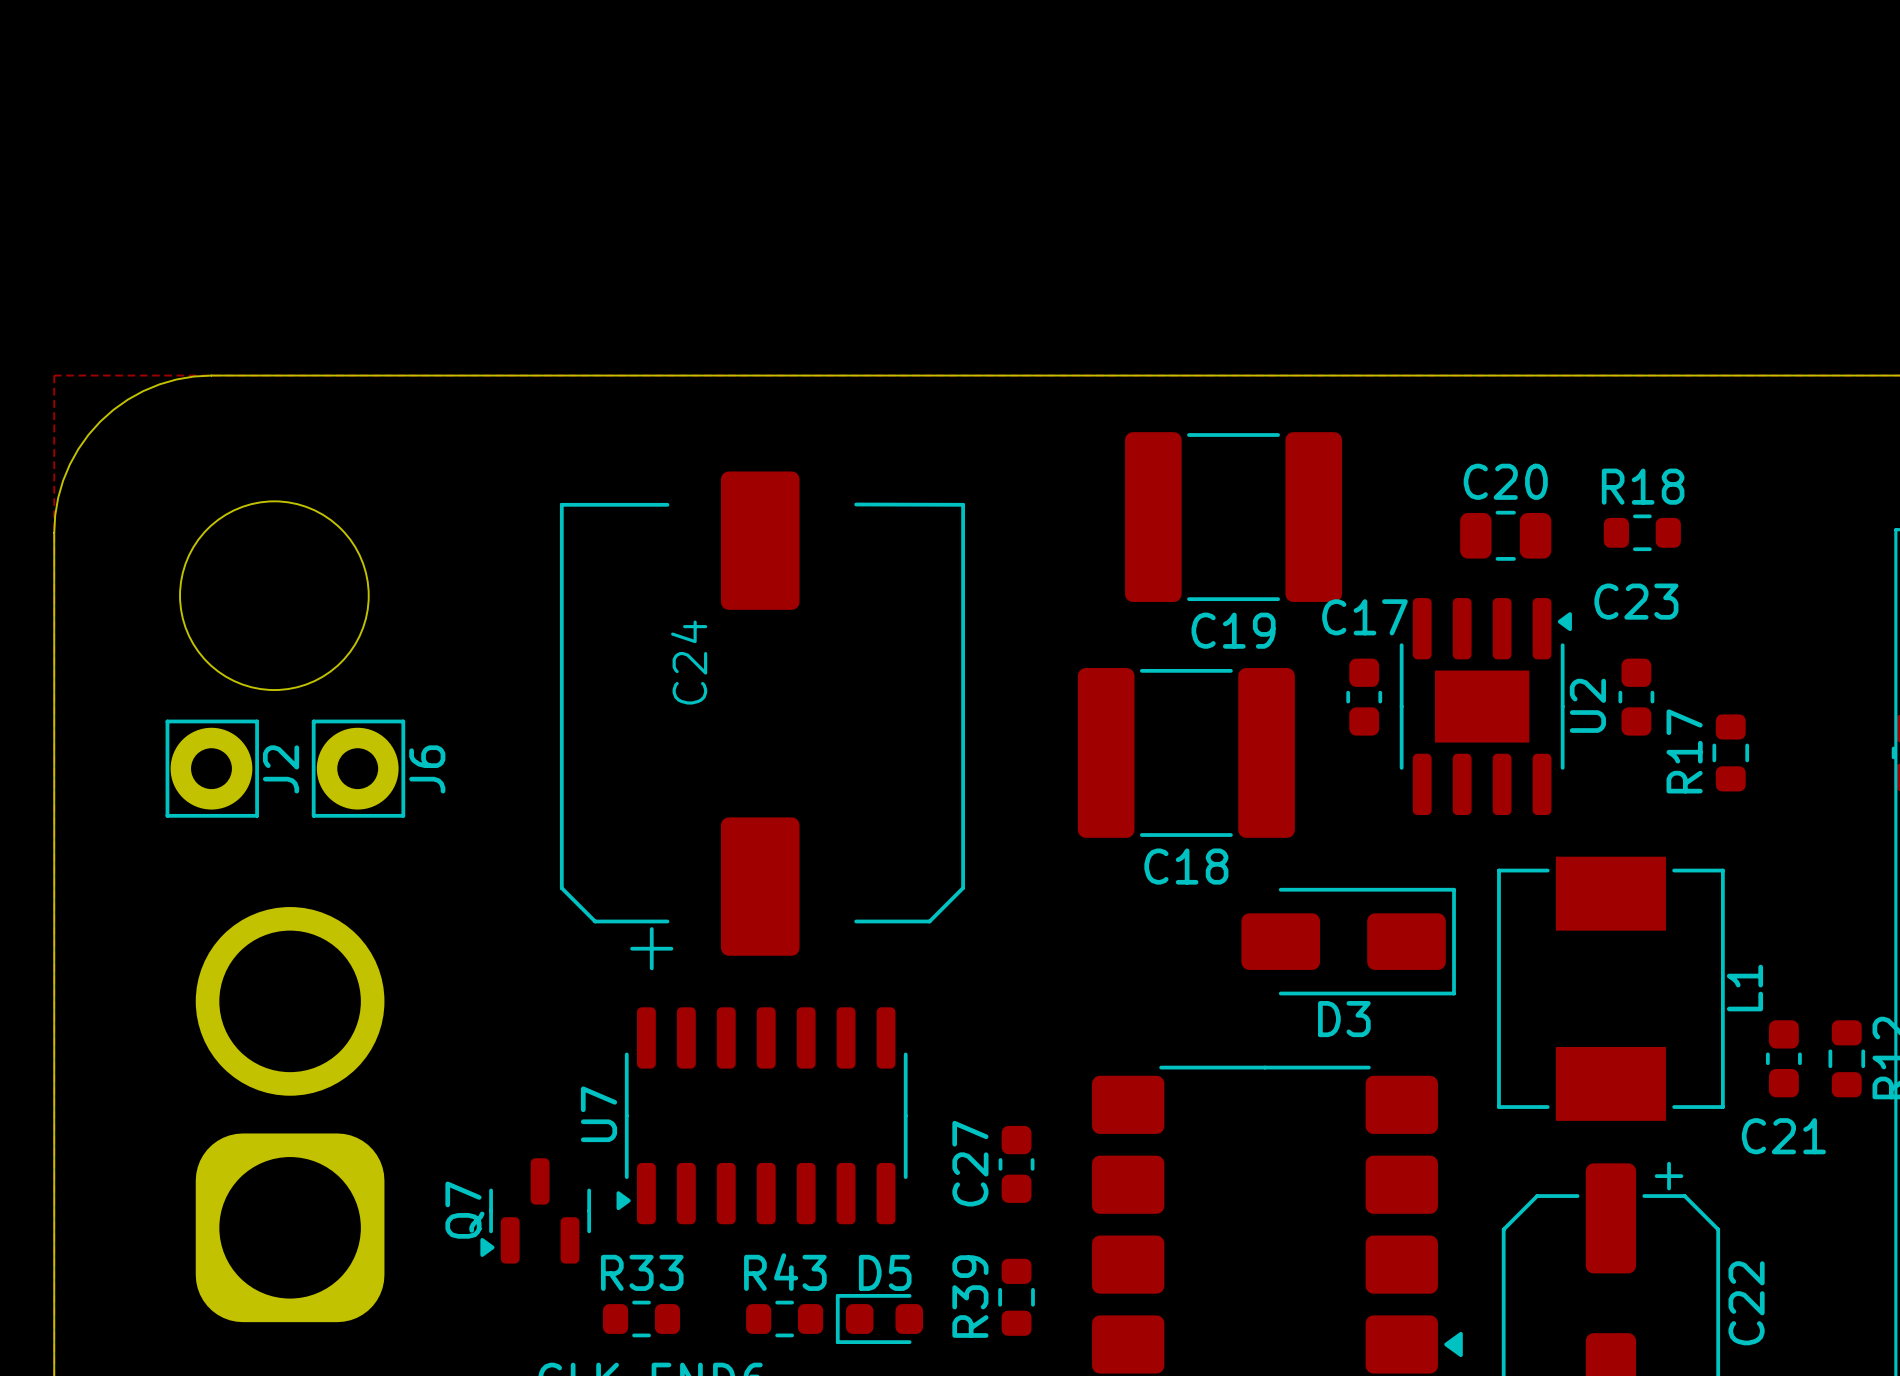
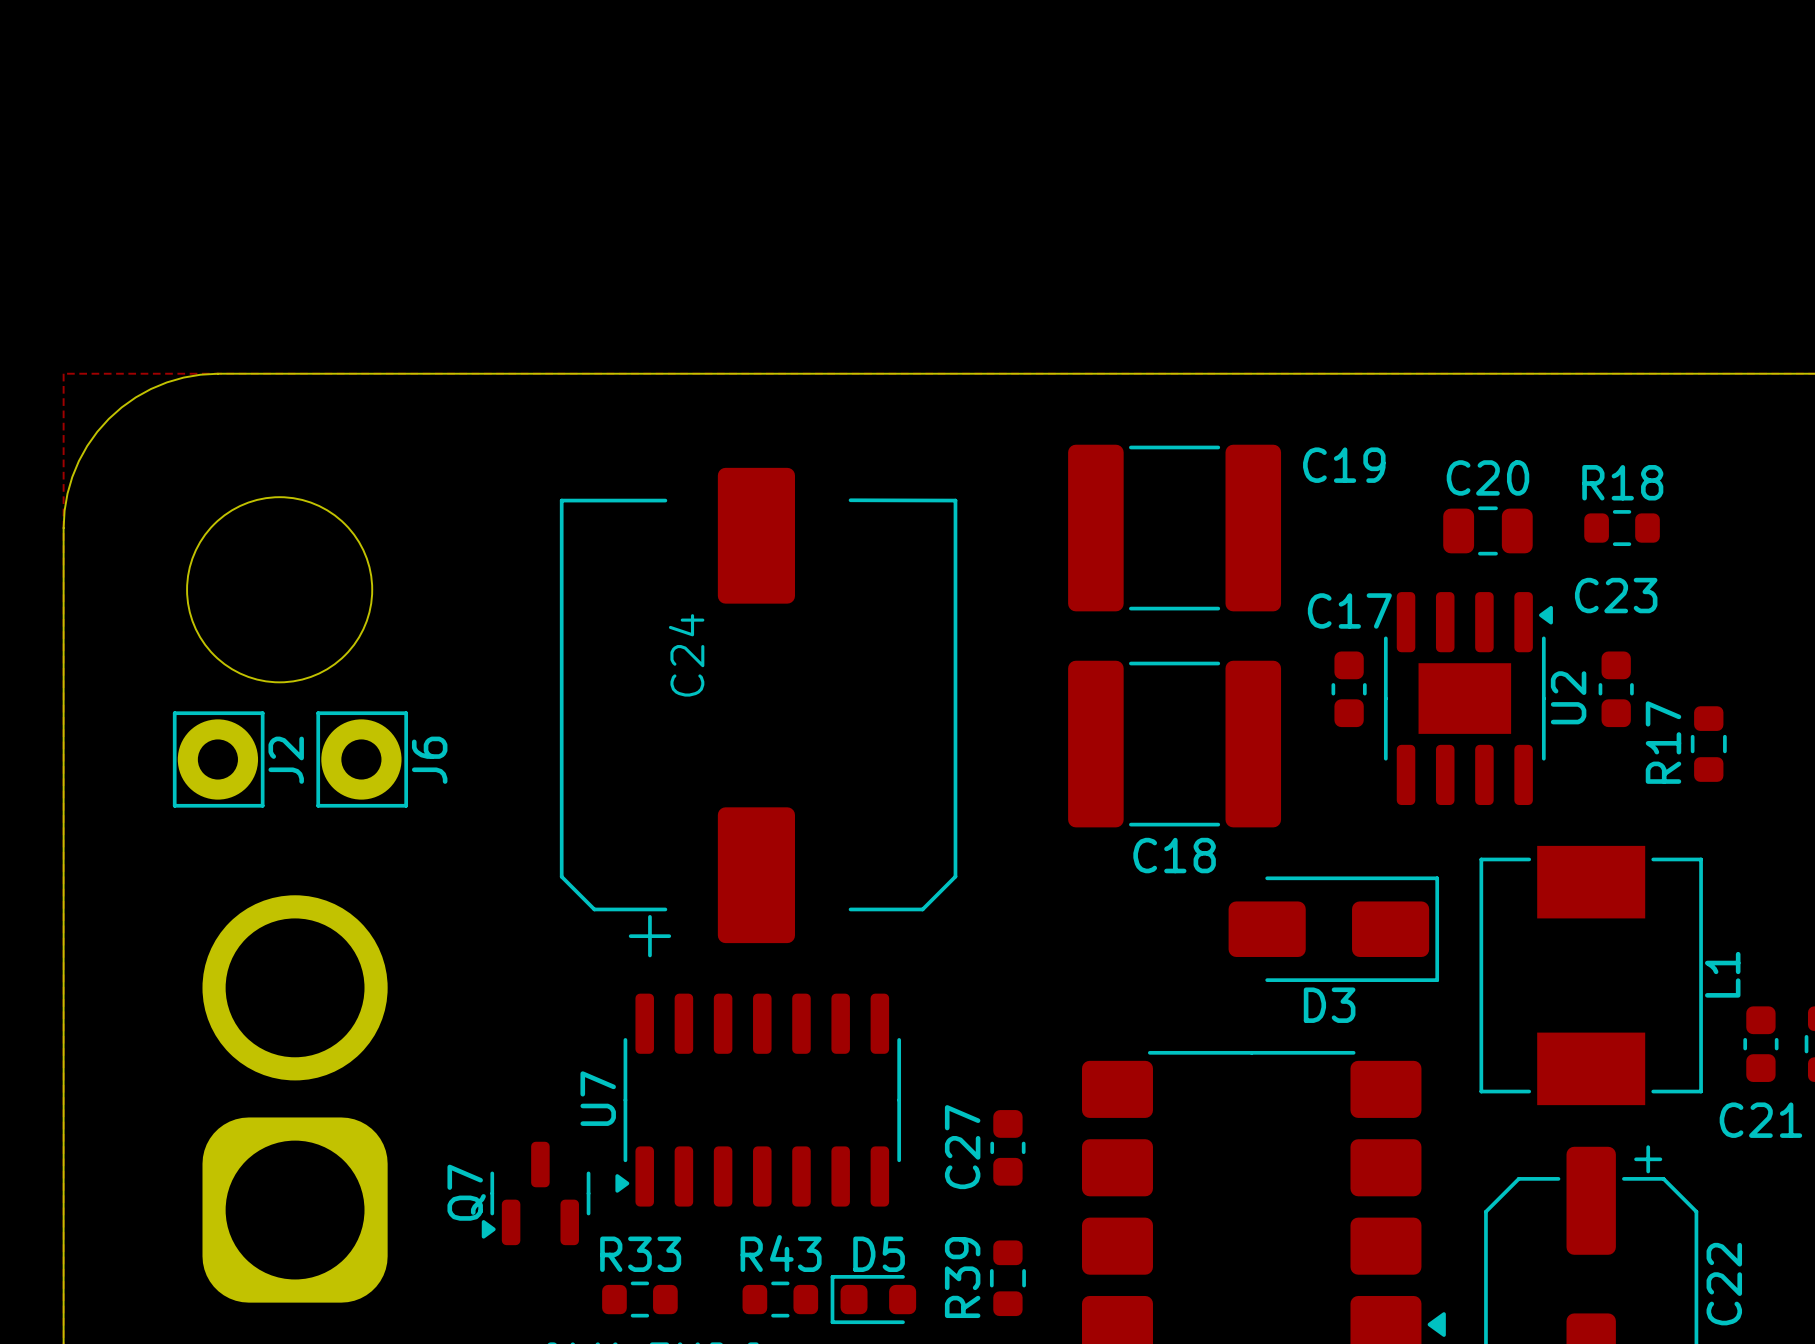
C19 position: (1233, 517) -> (1174, 528)
C19 name position: C19 (1233, 630) -> C19 (1344, 465)

